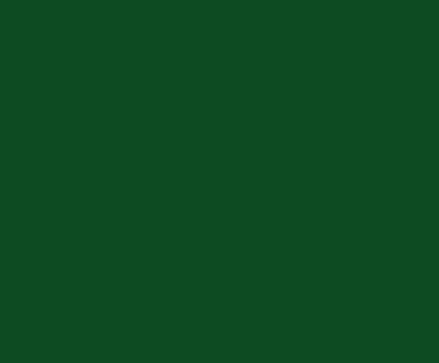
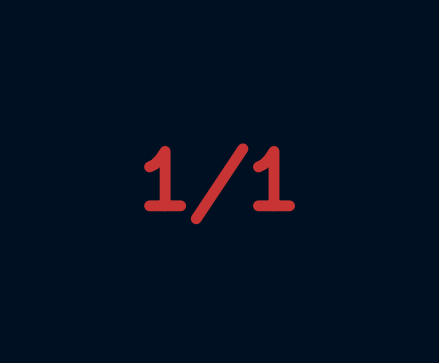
text: none -> 1/1 (219, 183)

